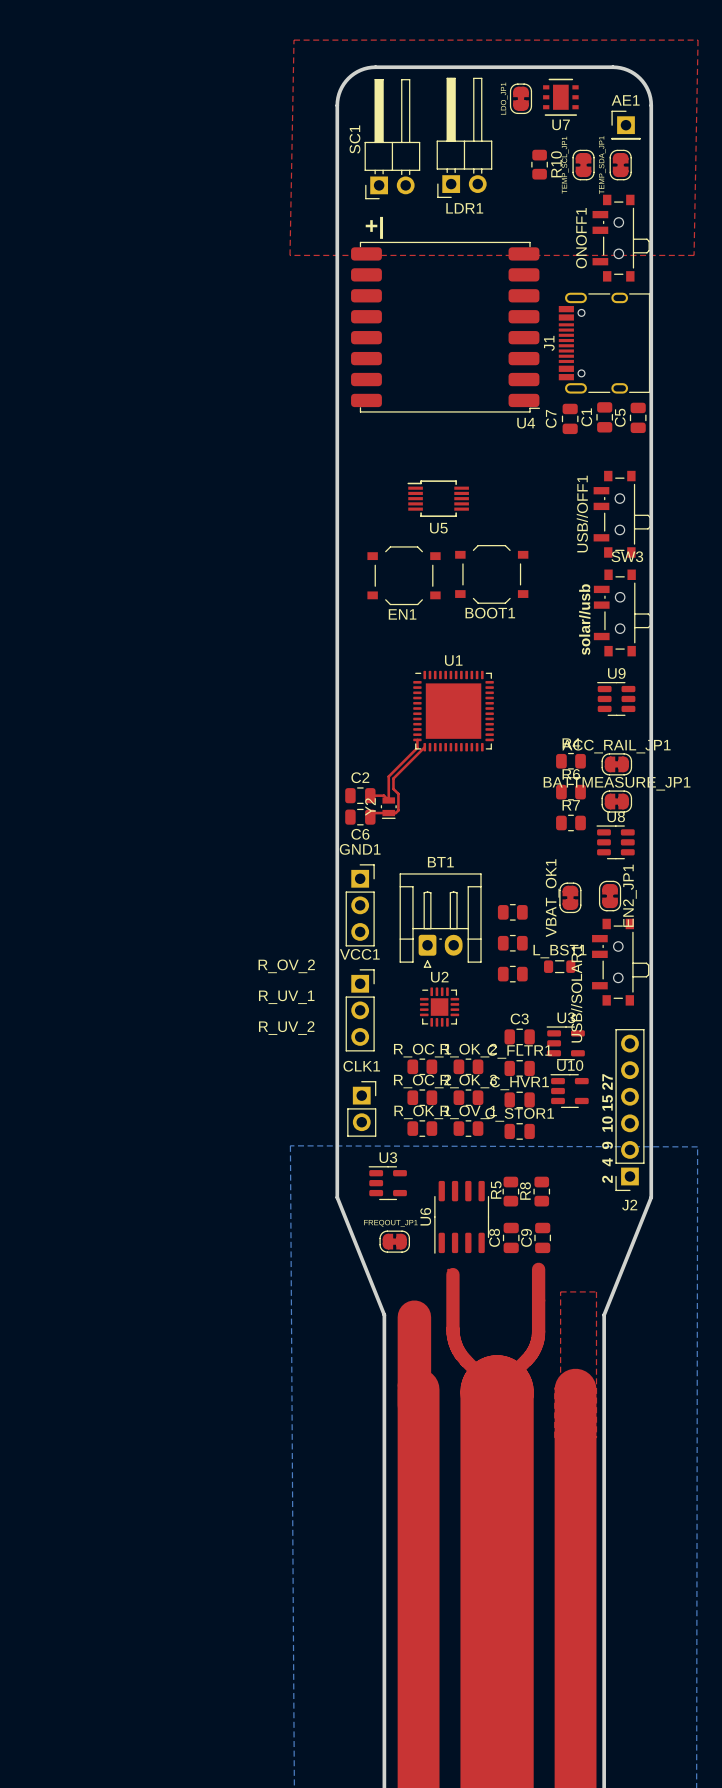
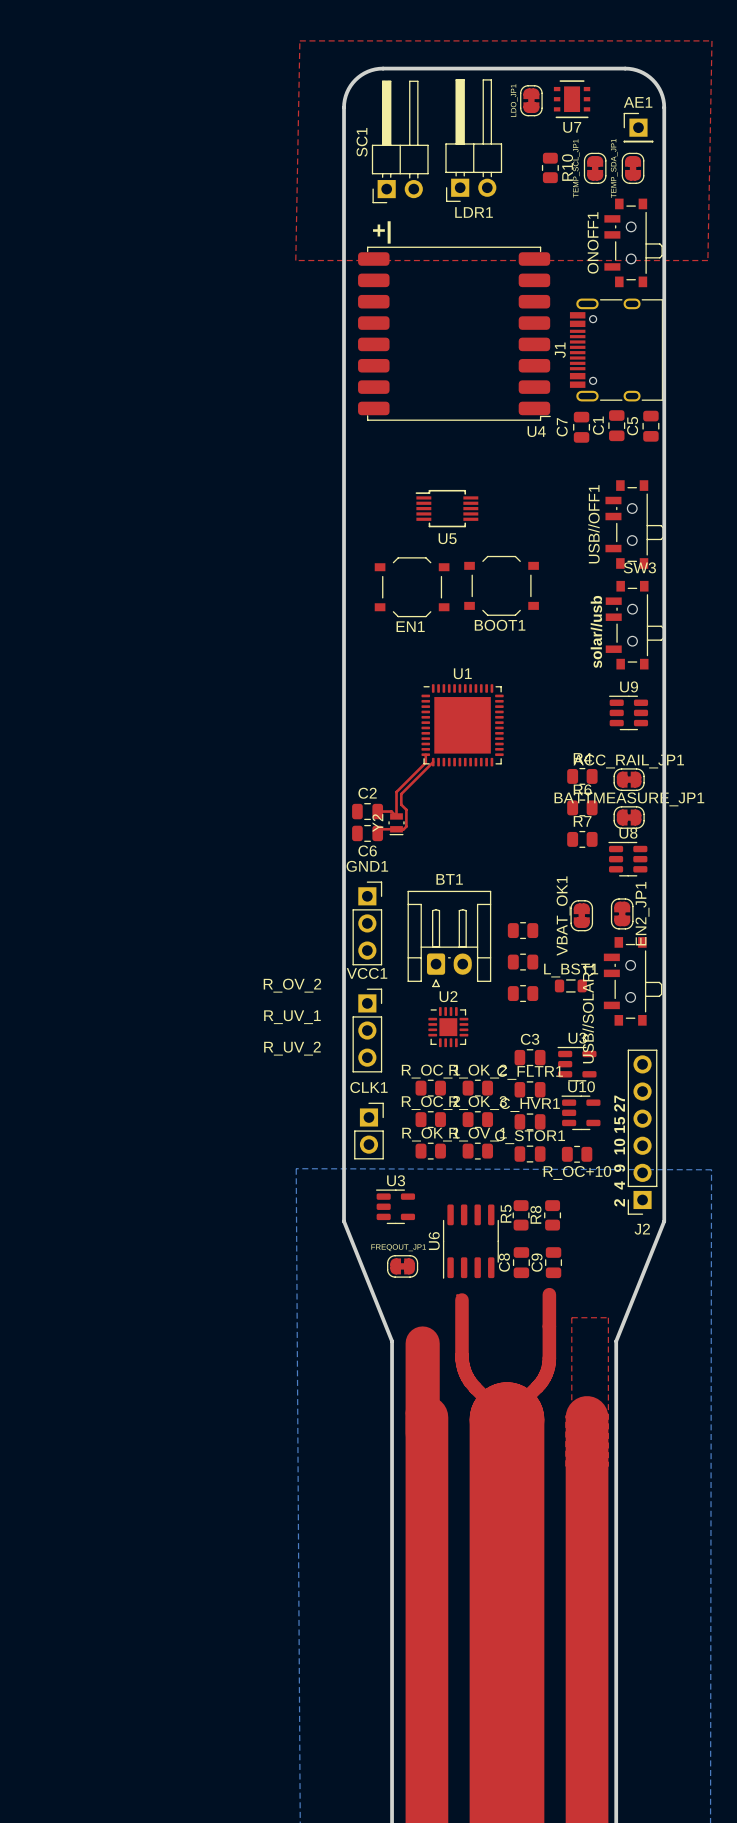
R_OC+10: none -> (577, 1154)

